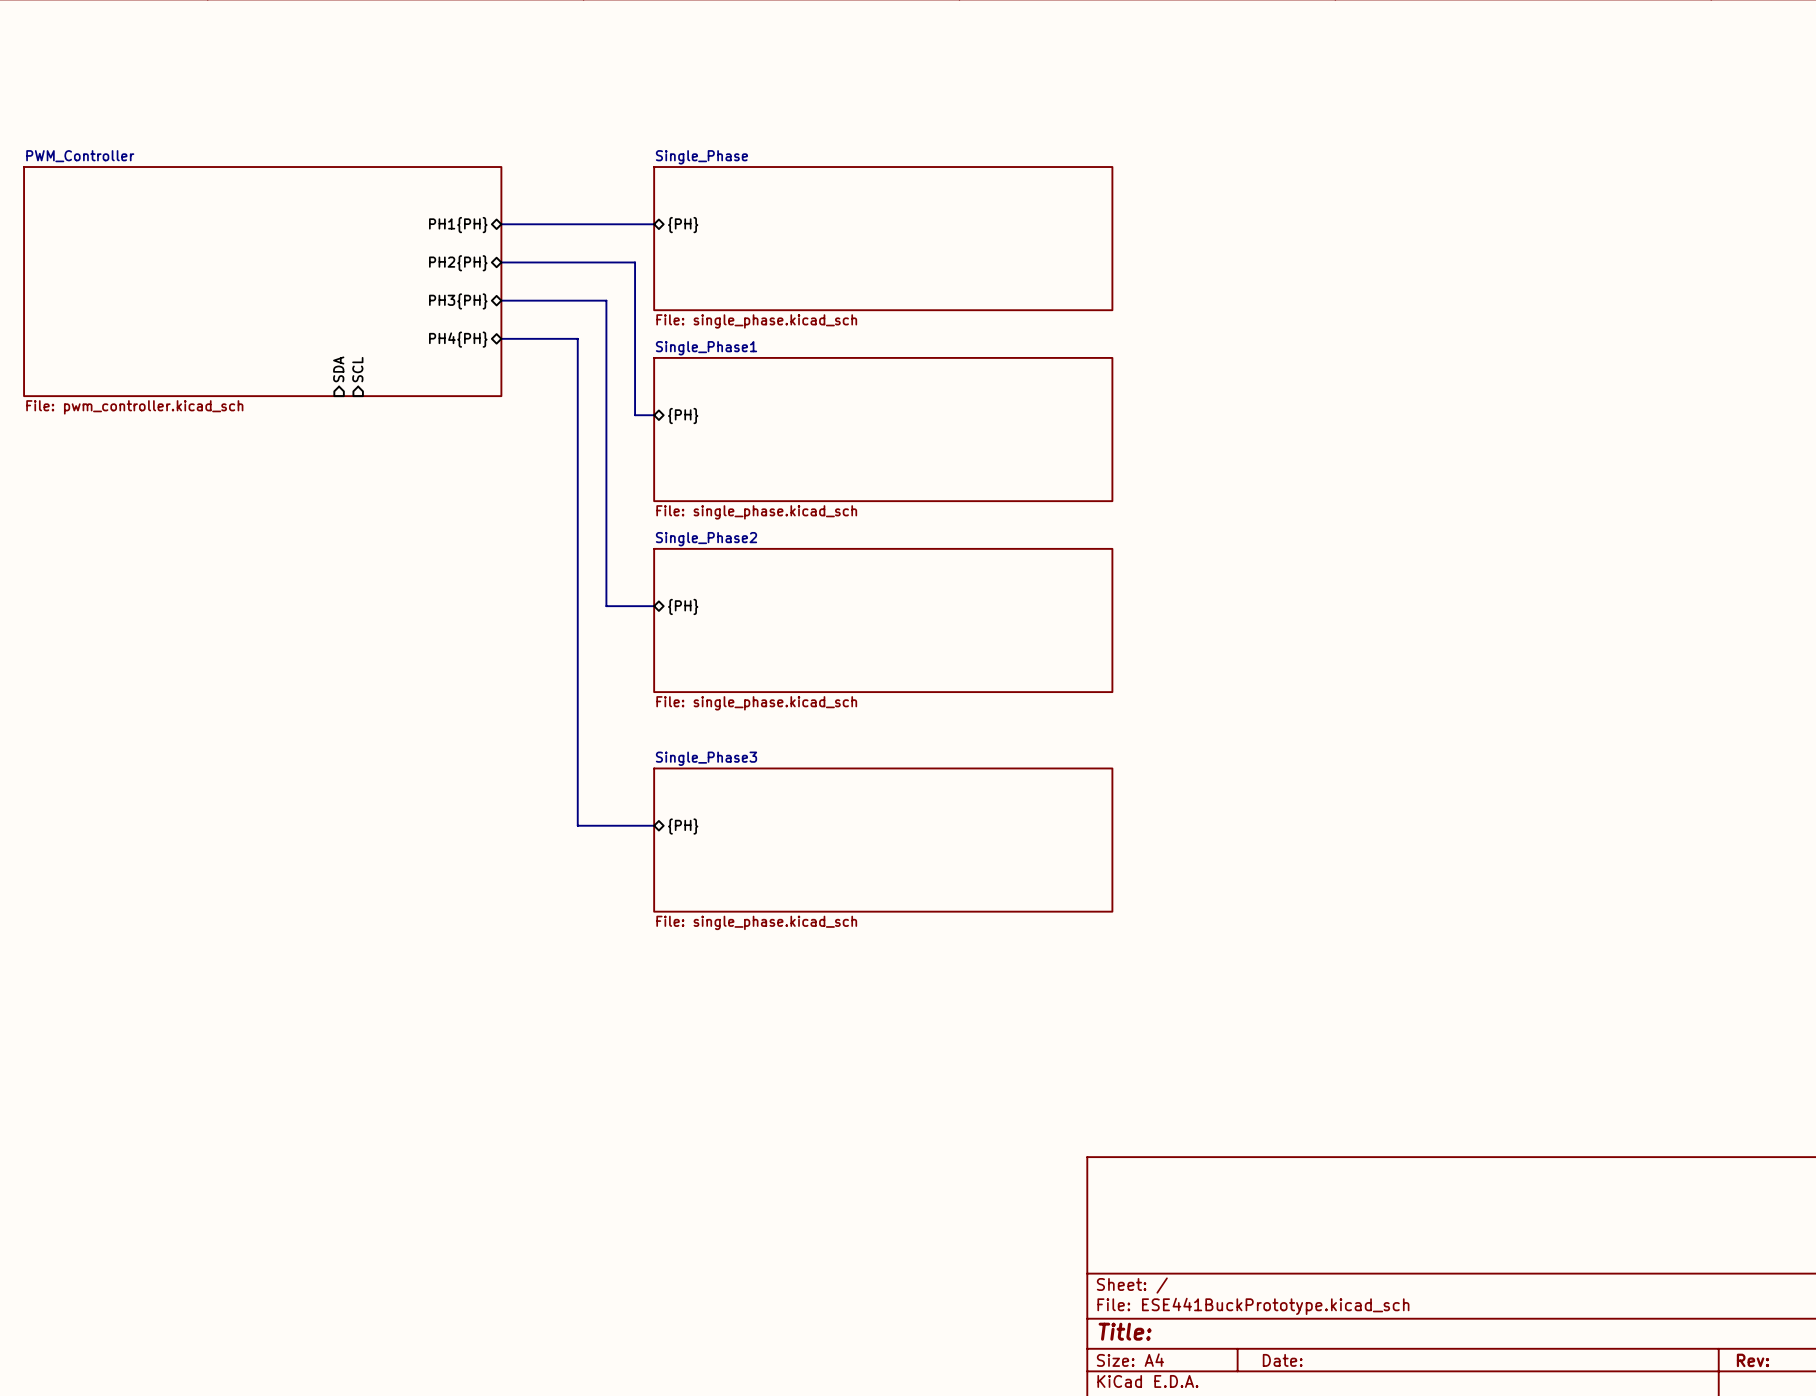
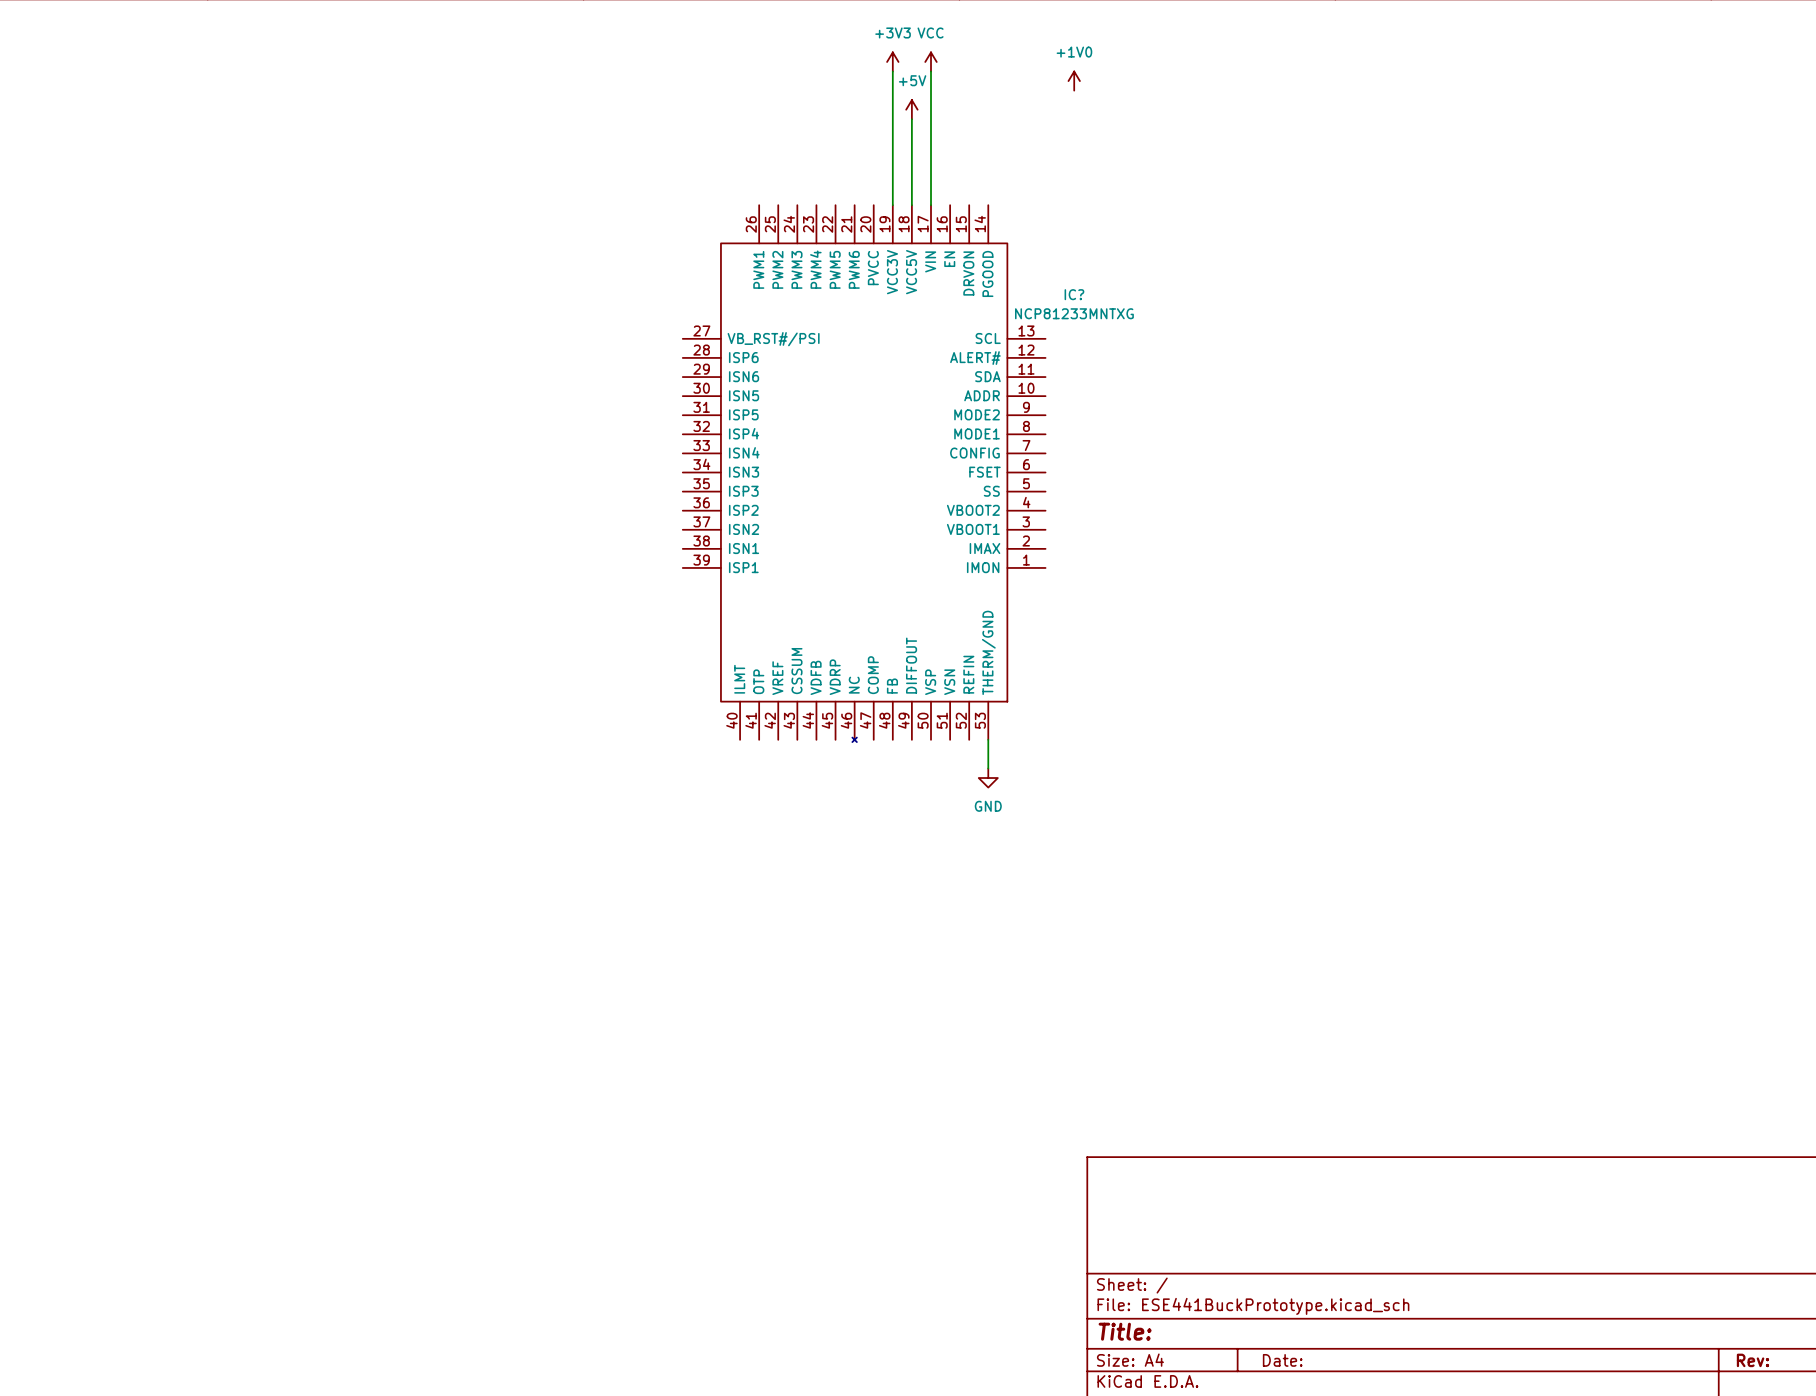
power symbol: none -> +3V3 (892, 61)
power symbol: none -> VCC (931, 61)
wire: none -> (892, 71) (892, 205)
wire: none -> (931, 71) (931, 205)
power symbol: none -> +1V0 (1074, 81)
power symbol: none -> +5V (911, 109)
wire: none -> (911, 119) (911, 205)
bus: (501, 224) (654, 224) -> none
sheet pin: PH1{PH} (458, 225) -> none
sheet pin: {PH} (683, 225) -> none
sheet Single_Phase: File: single_phase.kicad_sch (883, 238) -> none
bus: (501, 262) (635, 262) (635, 415) (654, 415) -> none
sheet pin: PH2{PH} (458, 263) -> none
sheet PWM_Controller: File: pwm_controller.kicad_sch (262, 281) -> none
bus: (501, 300) (606, 300) (606, 606) (654, 606) -> none
sheet pin: PH3{PH} (458, 301) -> none
bus: (501, 338) (577, 338) (577, 825) (654, 825) -> none
sheet pin: PH4{PH} (458, 339) -> none
sheet pin: SDA (338, 369) -> none
sheet pin: SCL (357, 369) -> none
sheet pin: {PH} (683, 416) -> none
sheet Single_Phase1: File: single_phase.kicad_sch (883, 429) -> none
IC?: none -> NCP81233MNTXG (864, 473)
sheet pin: {PH} (683, 606) -> none
sheet Single_Phase2: File: single_phase.kicad_sch (883, 620) -> none
wire: none -> (988, 739) (988, 768)
power symbol: none -> GND (988, 778)
sheet pin: {PH} (683, 826) -> none
sheet Single_Phase3: File: single_phase.kicad_sch (883, 840) -> none

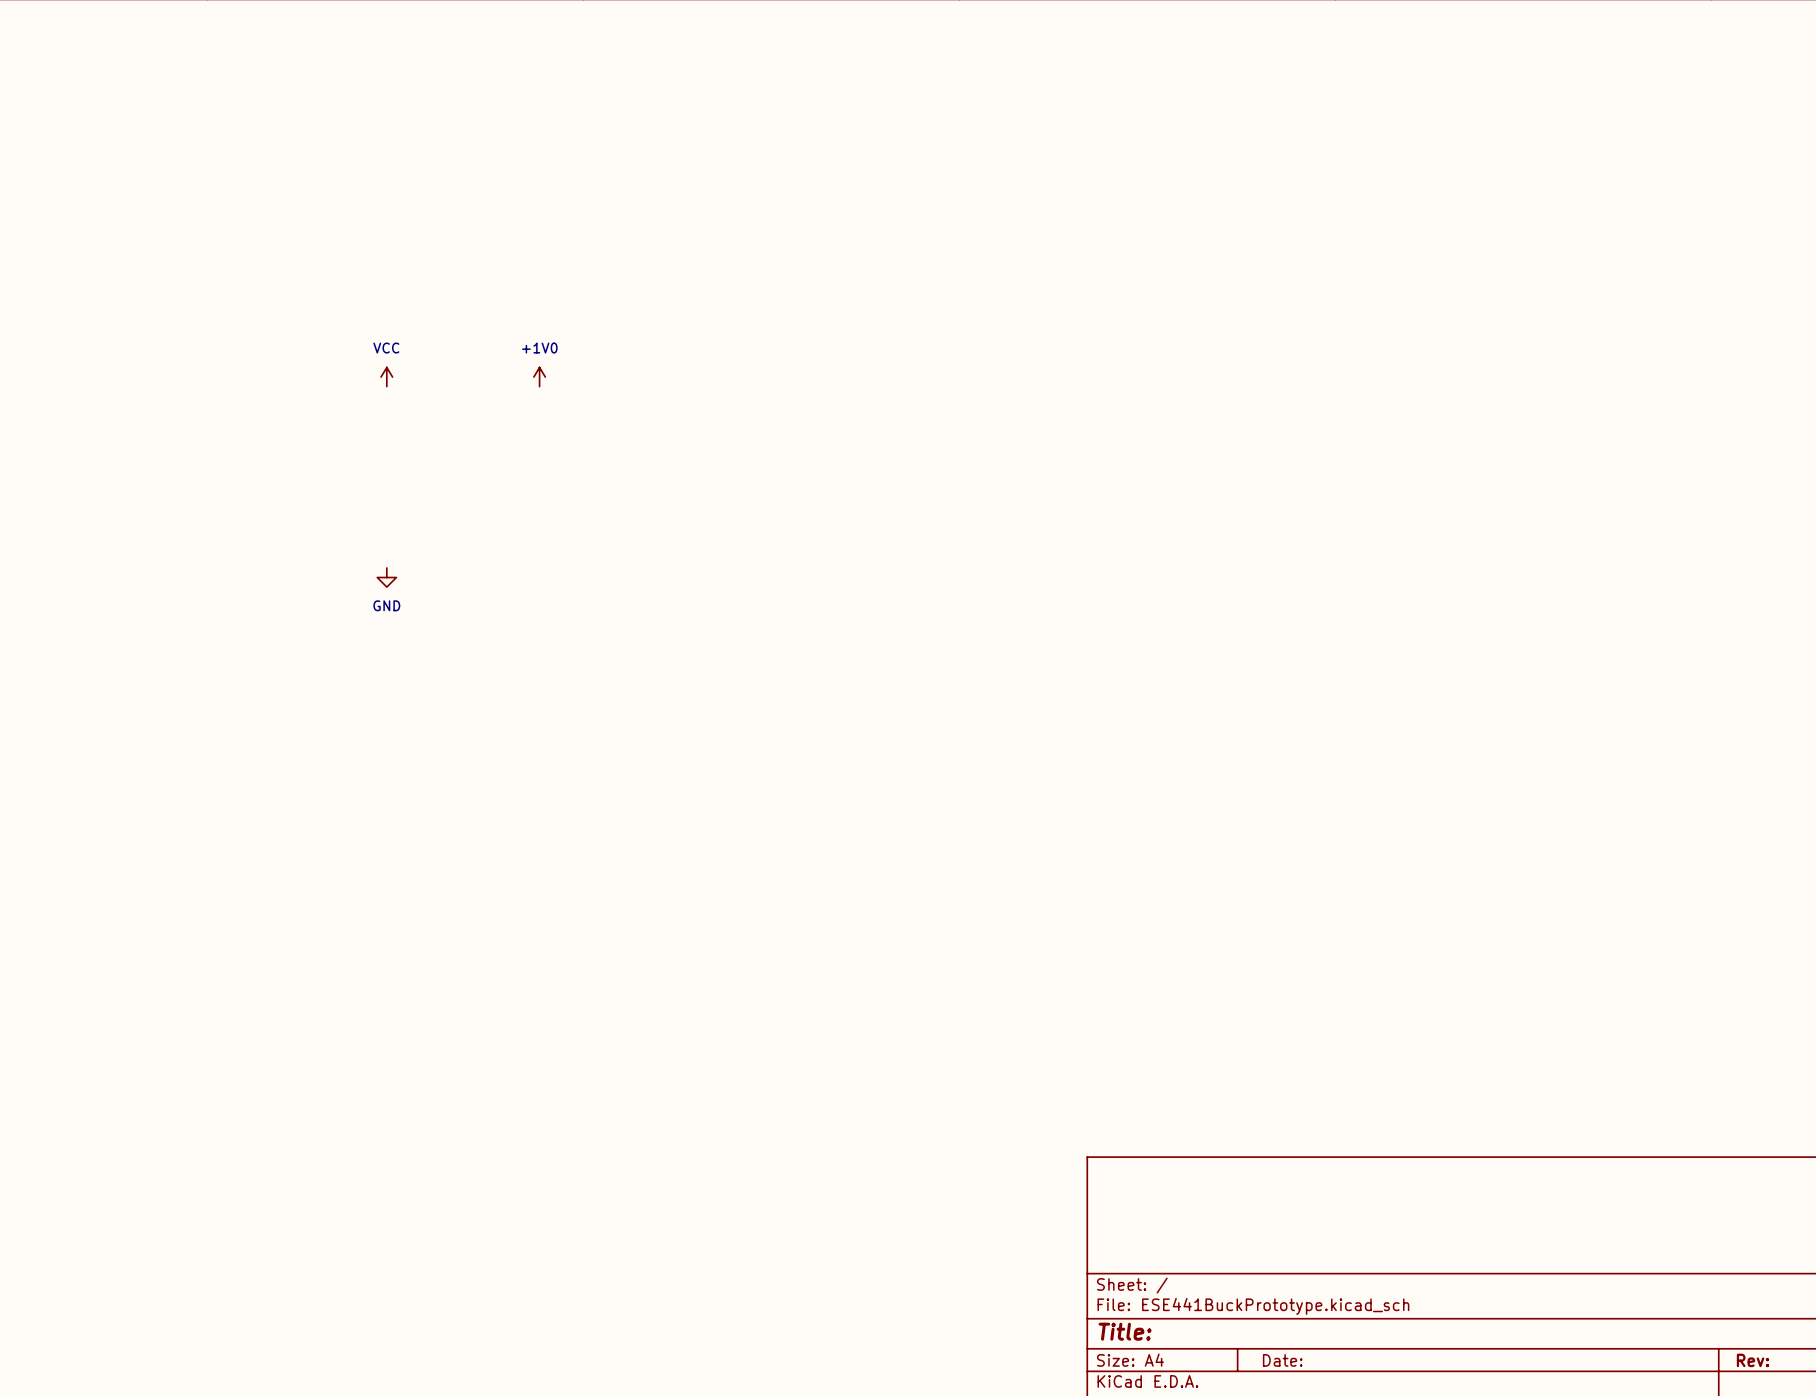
power symbol: +3V3 (892, 61) -> none
power symbol: VCC (931, 61) -> none
wire: (892, 71) (892, 205) -> none
wire: (931, 71) (931, 205) -> none
power symbol: +1V0 (1074, 81) -> none
power symbol: +5V (911, 109) -> none
wire: (911, 119) (911, 205) -> none
power symbol: none -> VCC (386, 377)
power symbol: none -> +1V0 (539, 377)
IC?: NCP81233MNTXG (864, 473) -> none
power symbol: none -> GND (386, 577)
wire: (988, 739) (988, 768) -> none
power symbol: GND (988, 778) -> none

